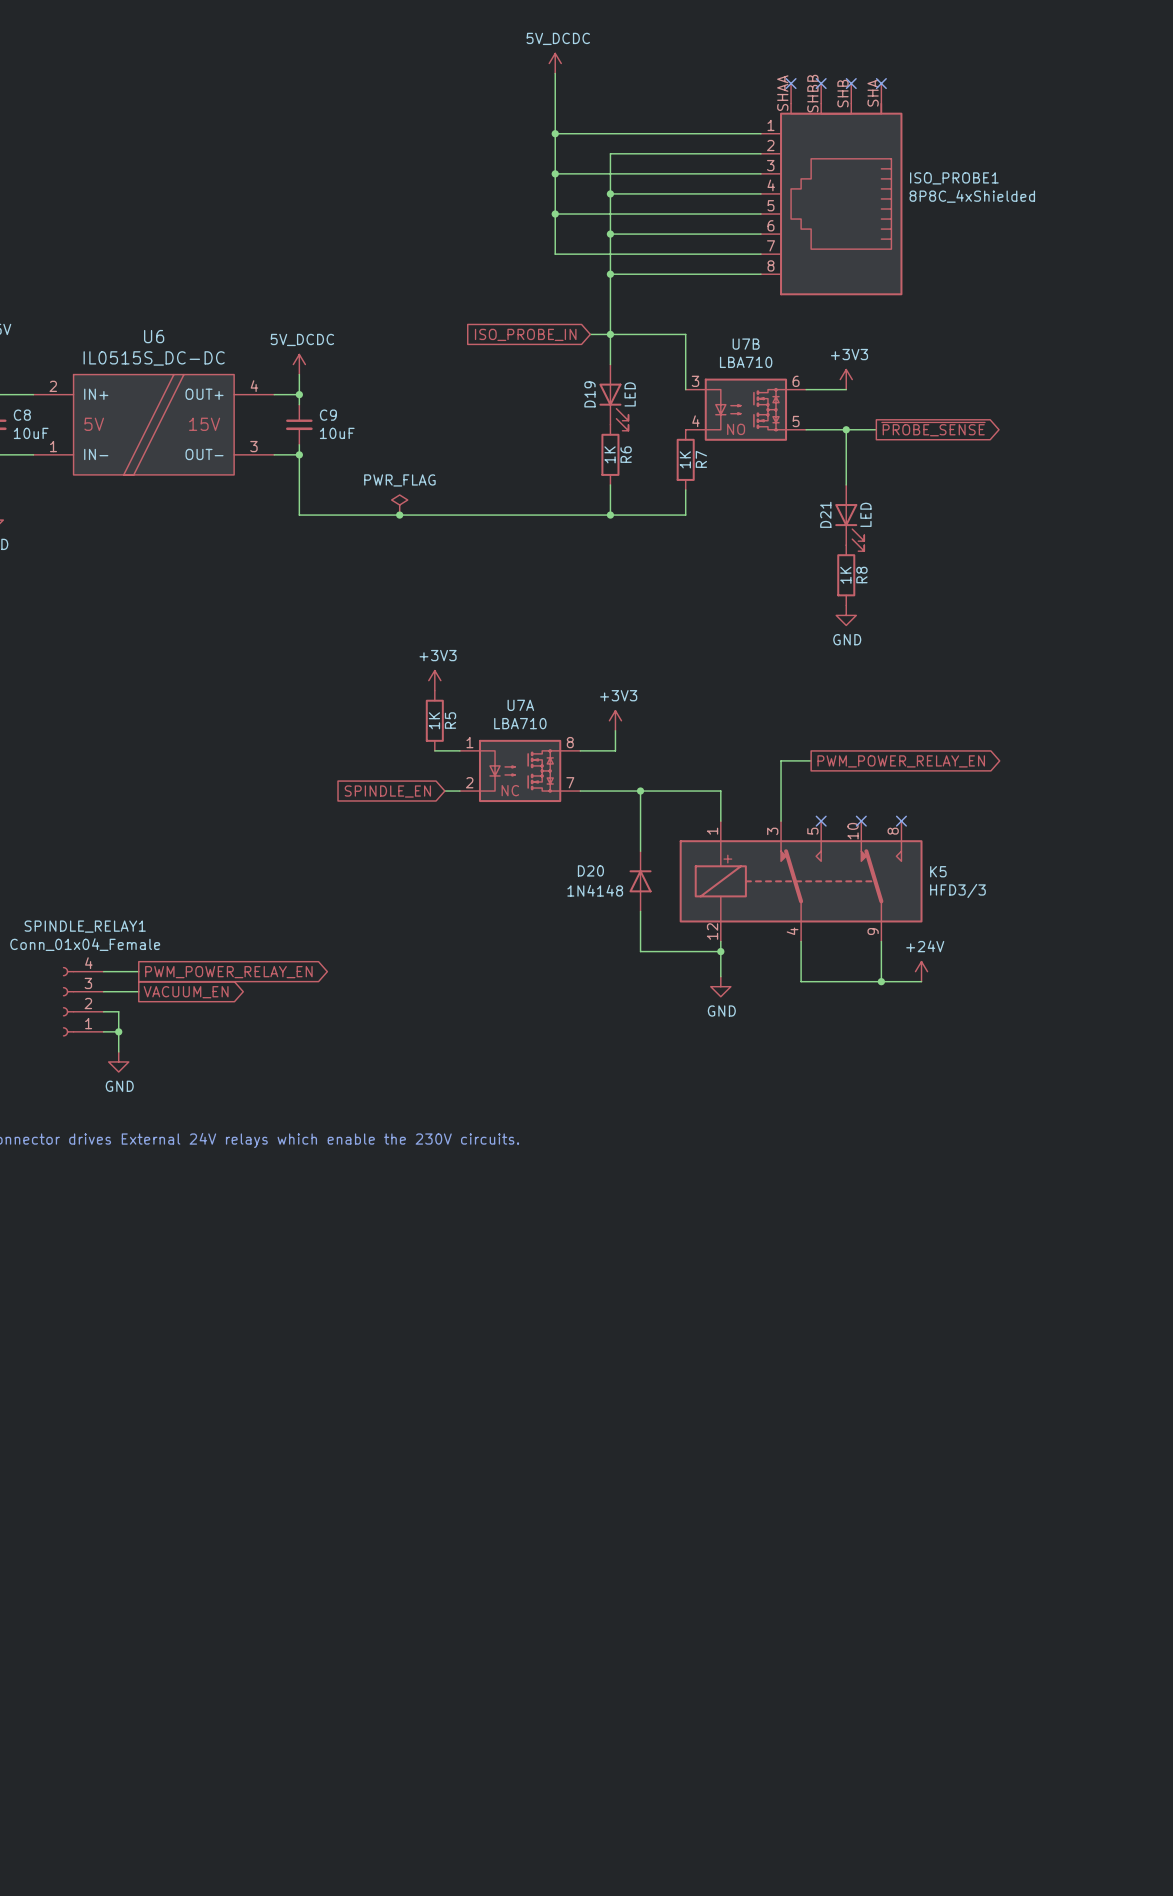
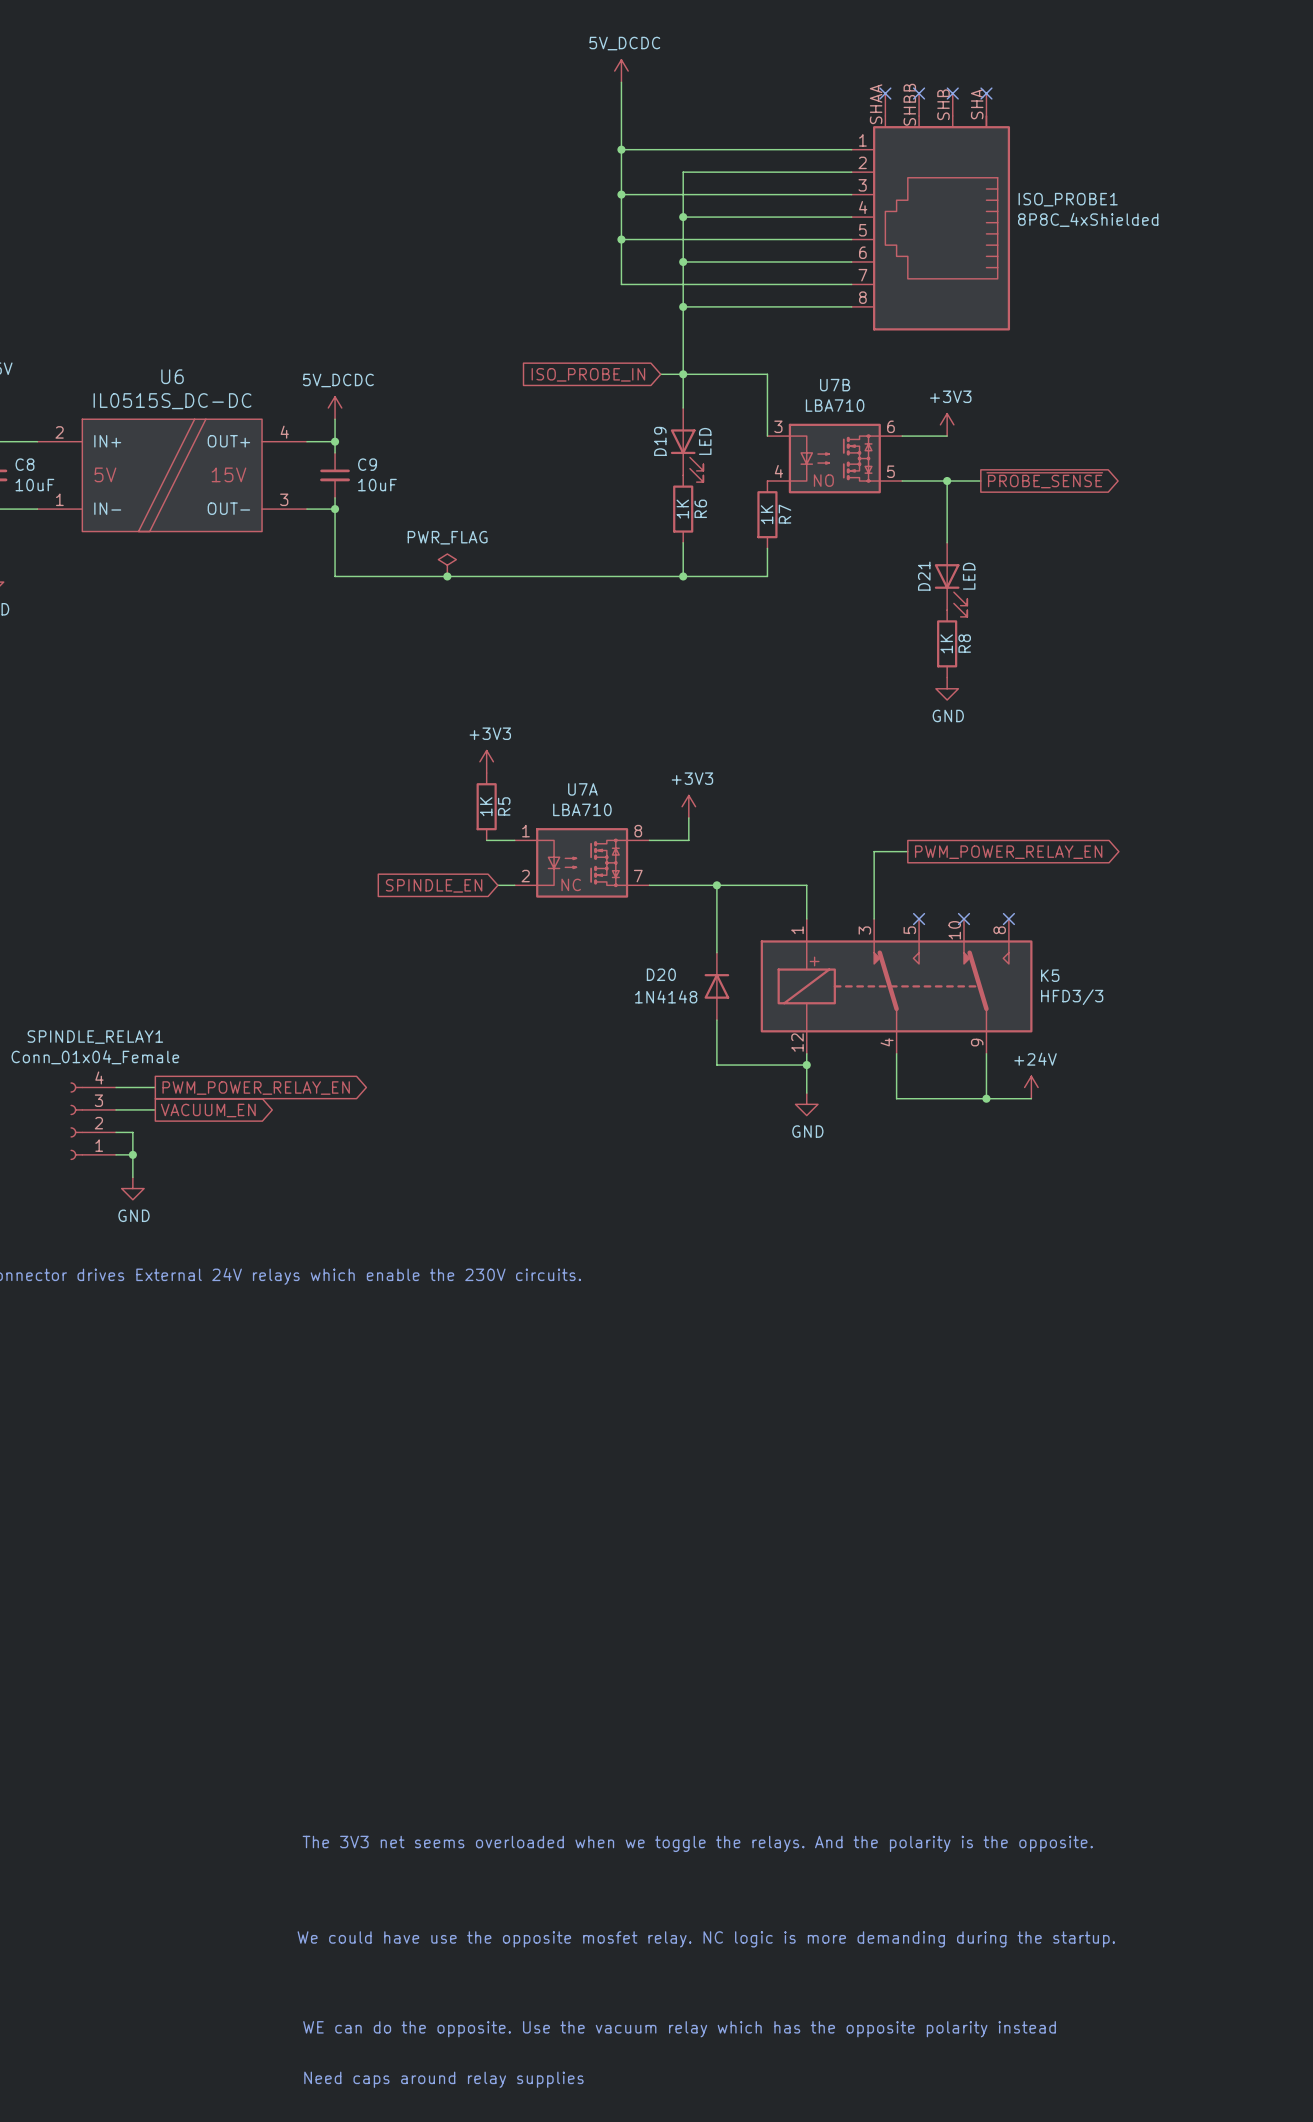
text: none -> The 3V3 net seems overloaded when we toggle the relays. And the polarity is the opposite. (697, 1843)
text: none -> We could have use the opposite mosfet relay. NC logic is more demanding during the startup. (706, 1939)
text: none -> WE can do the opposite. Use the vacuum relay which has the opposite polarity instead (679, 2029)
text: none -> Need caps around relay supplies (443, 2079)

